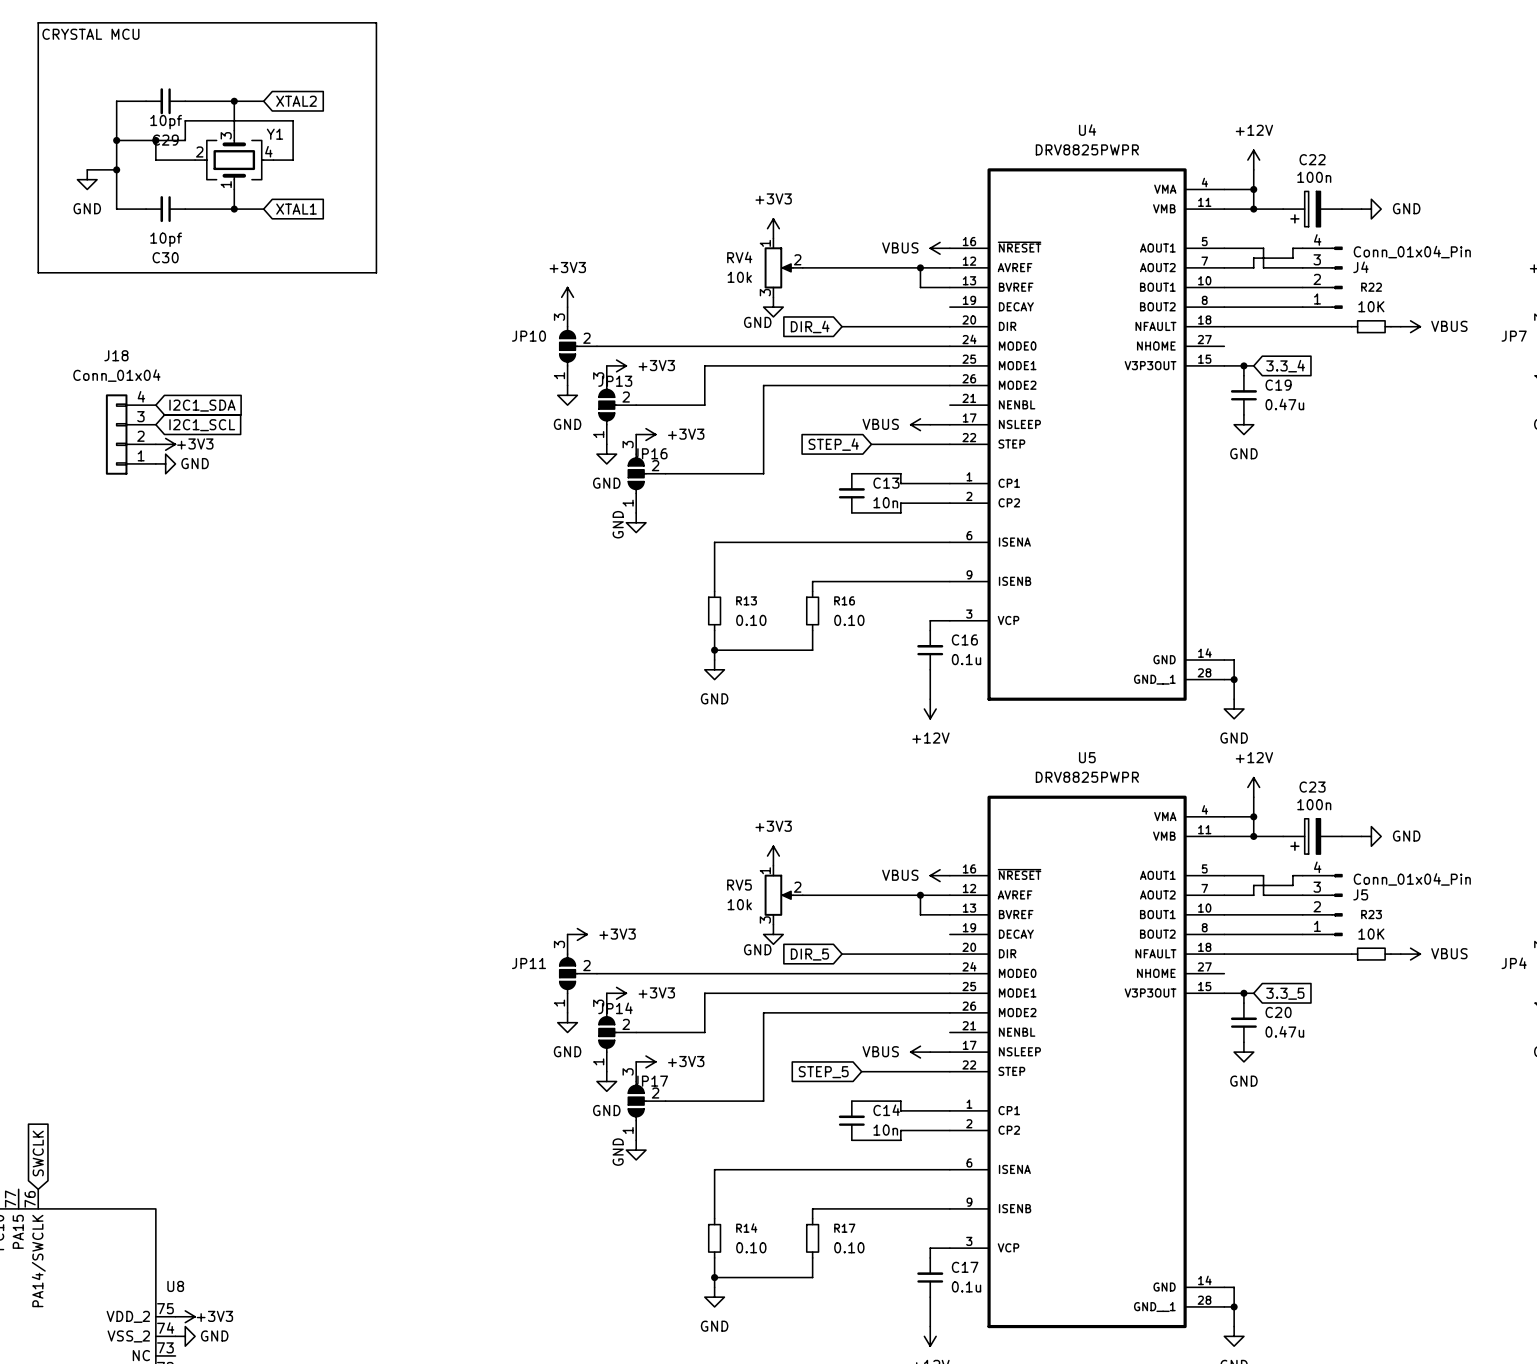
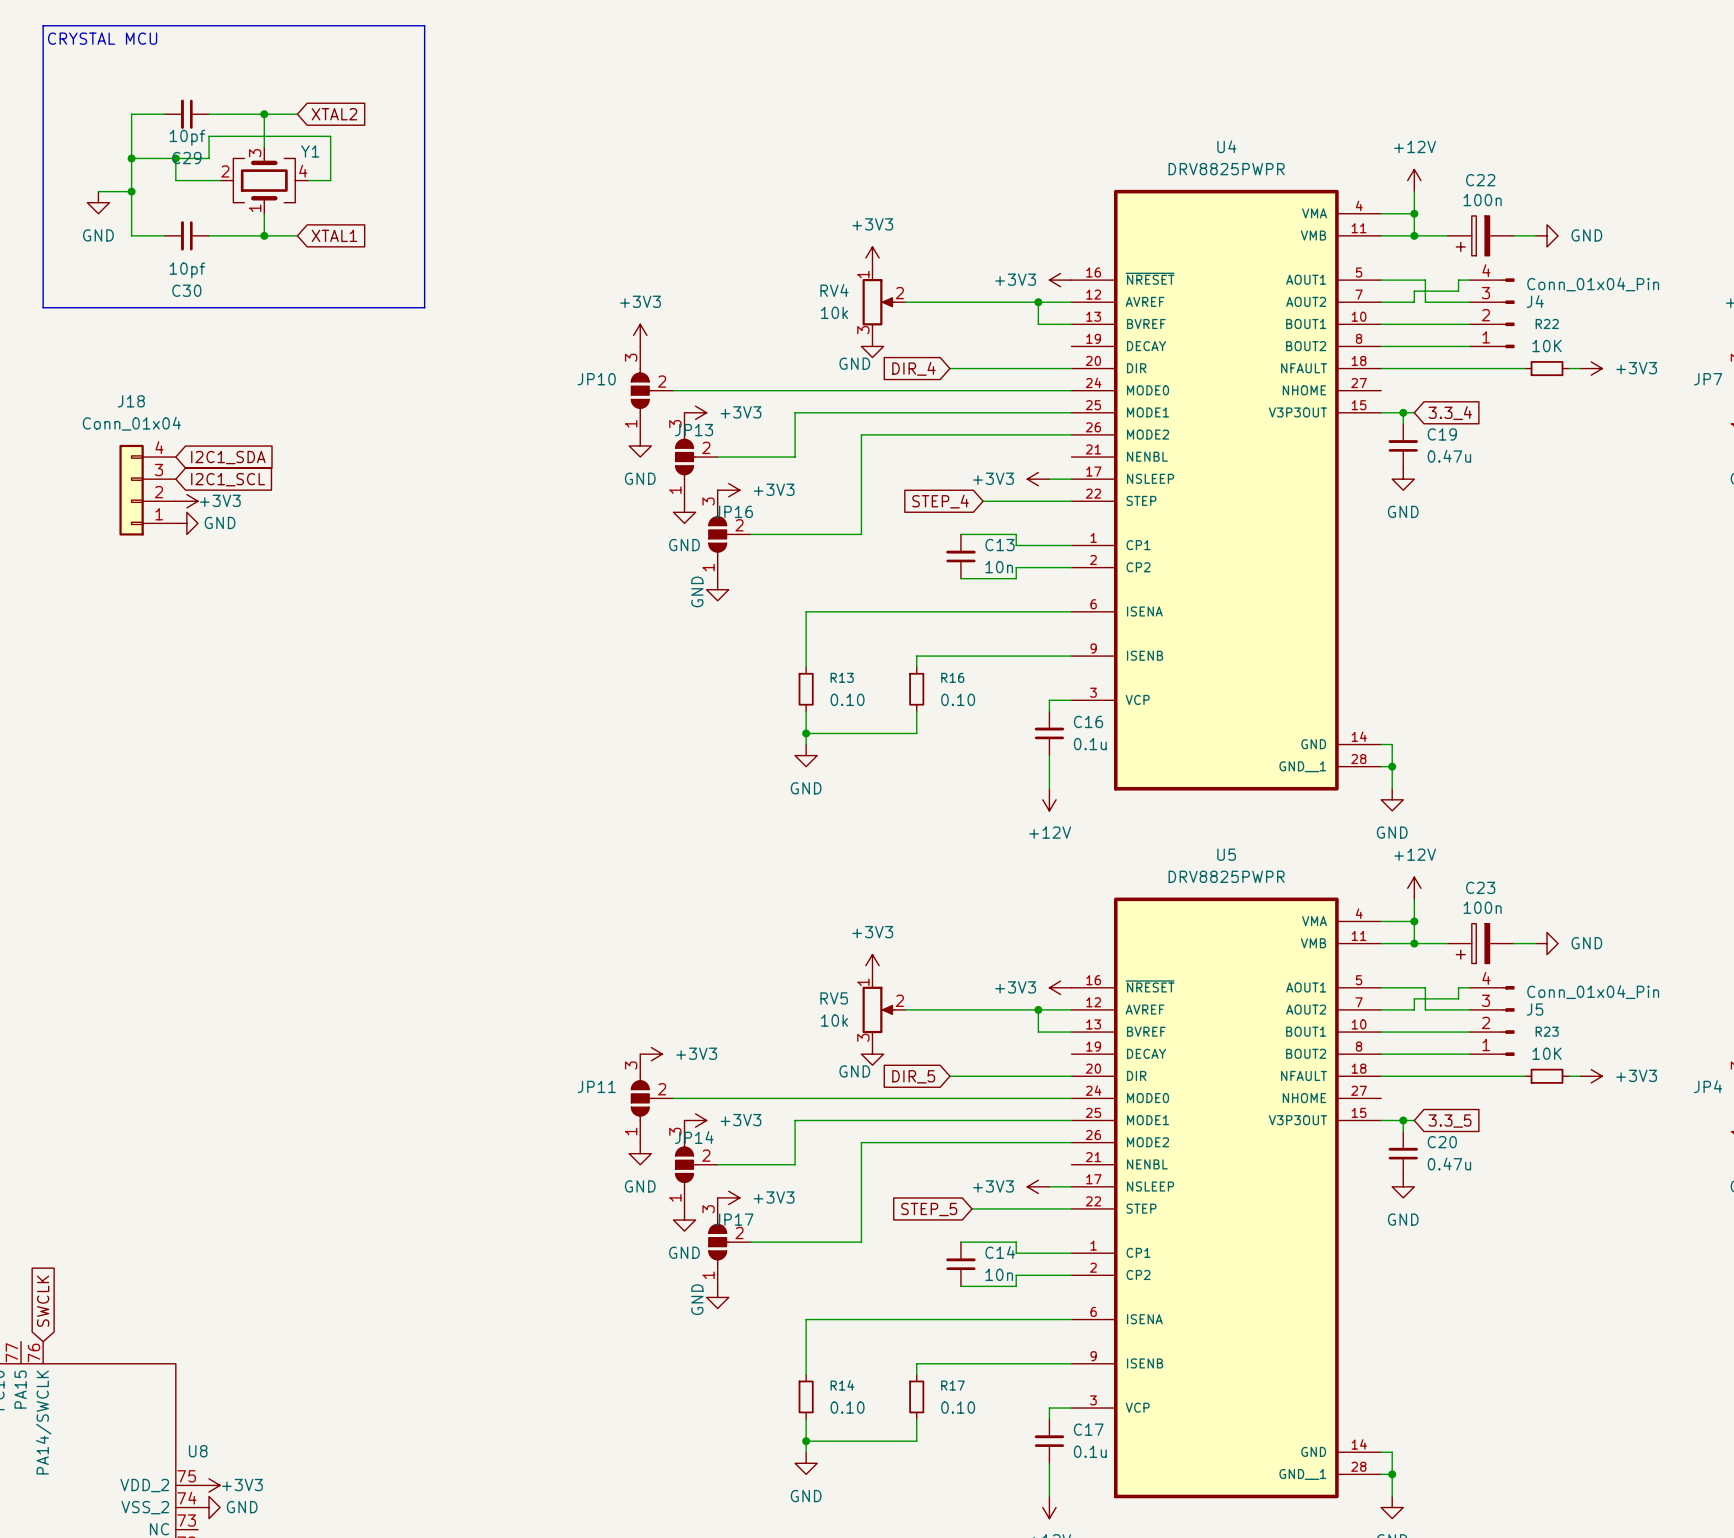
power symbol: VBUS (940, 248) -> +3V3 (1060, 280)
power symbol: VBUS (1410, 326) -> +3V3 (1591, 368)
power symbol: VBUS (920, 424) -> +3V3 (1038, 479)
power symbol: VBUS (940, 875) -> +3V3 (1060, 987)
power symbol: VBUS (1410, 954) -> +3V3 (1591, 1076)
power symbol: VBUS (920, 1052) -> +3V3 (1038, 1186)

